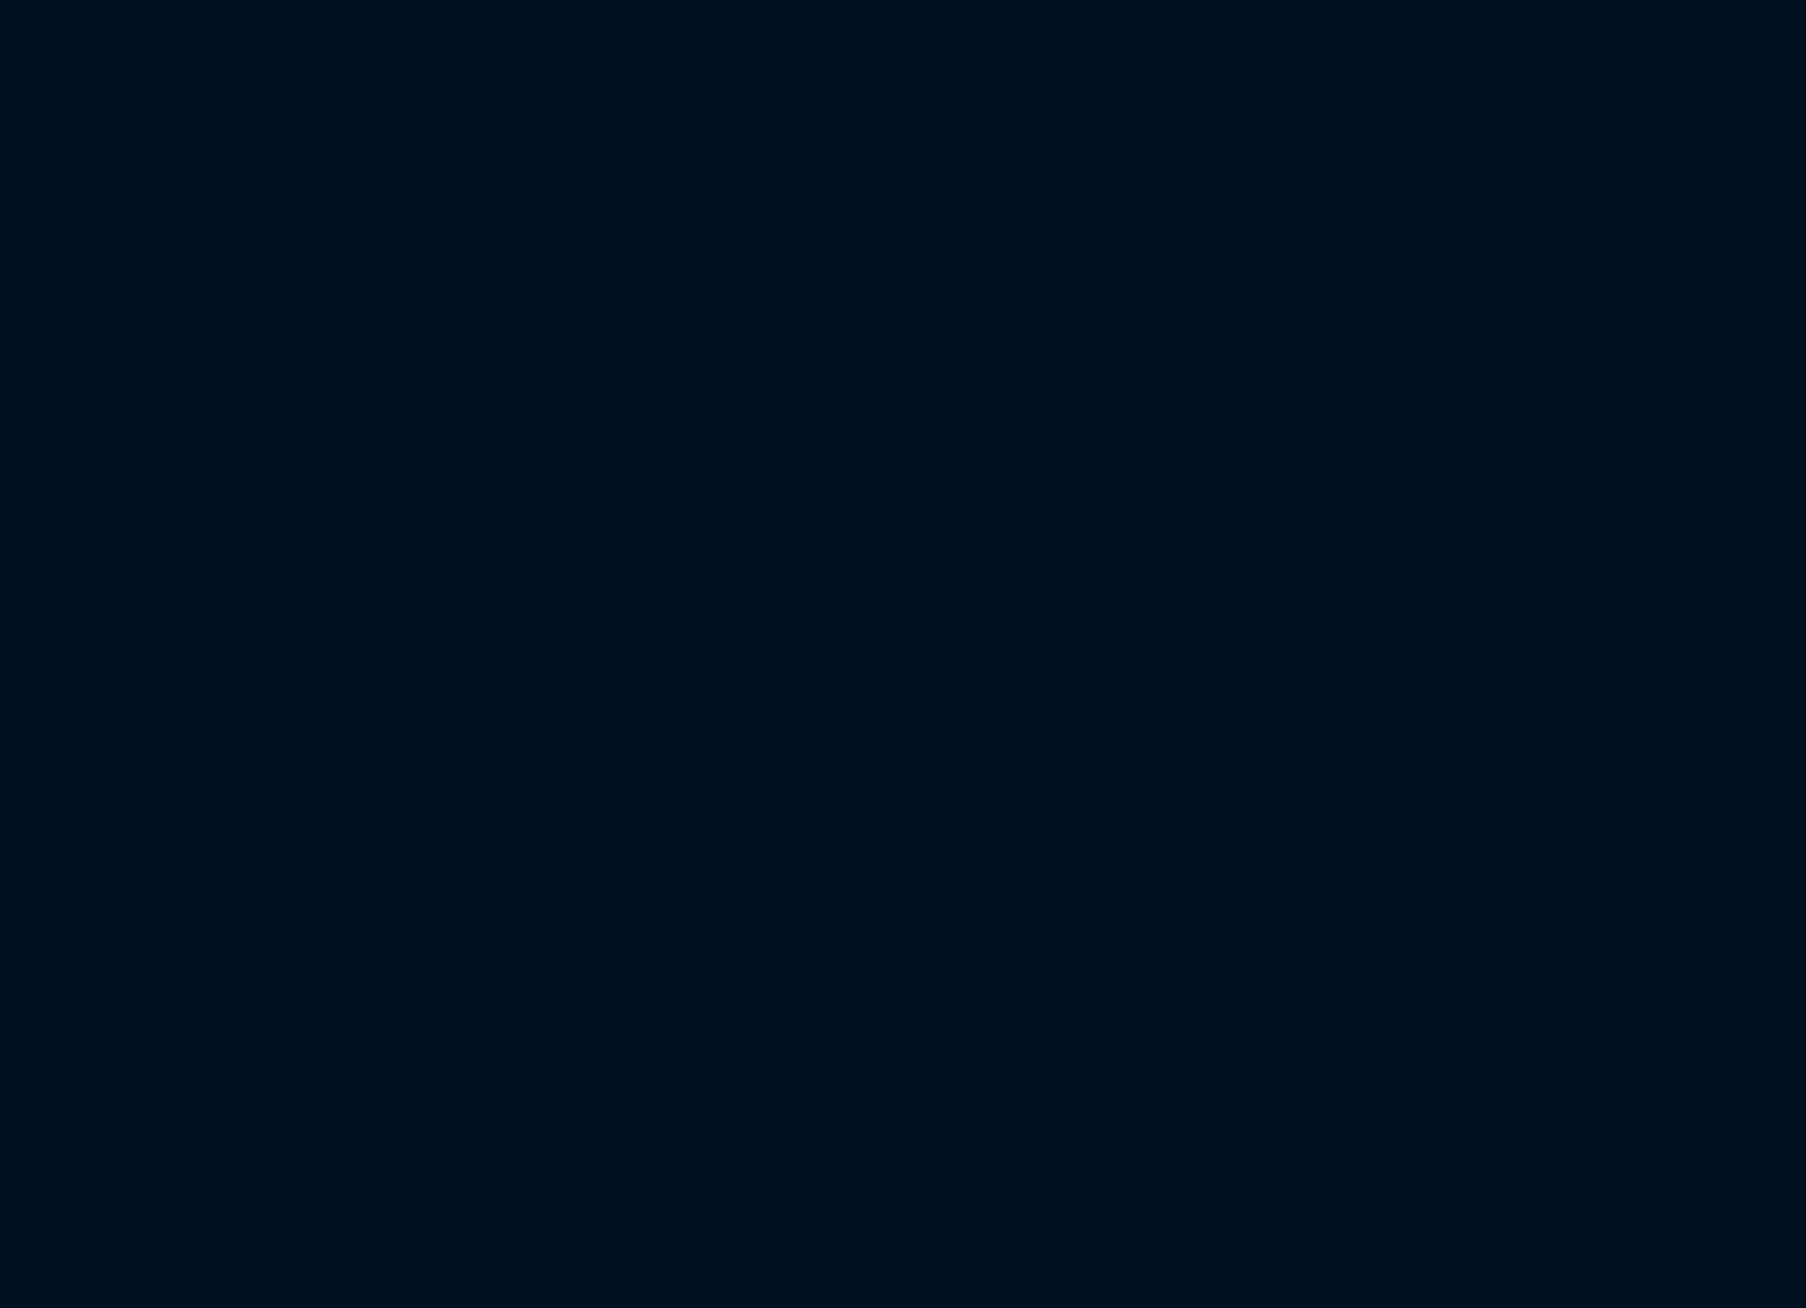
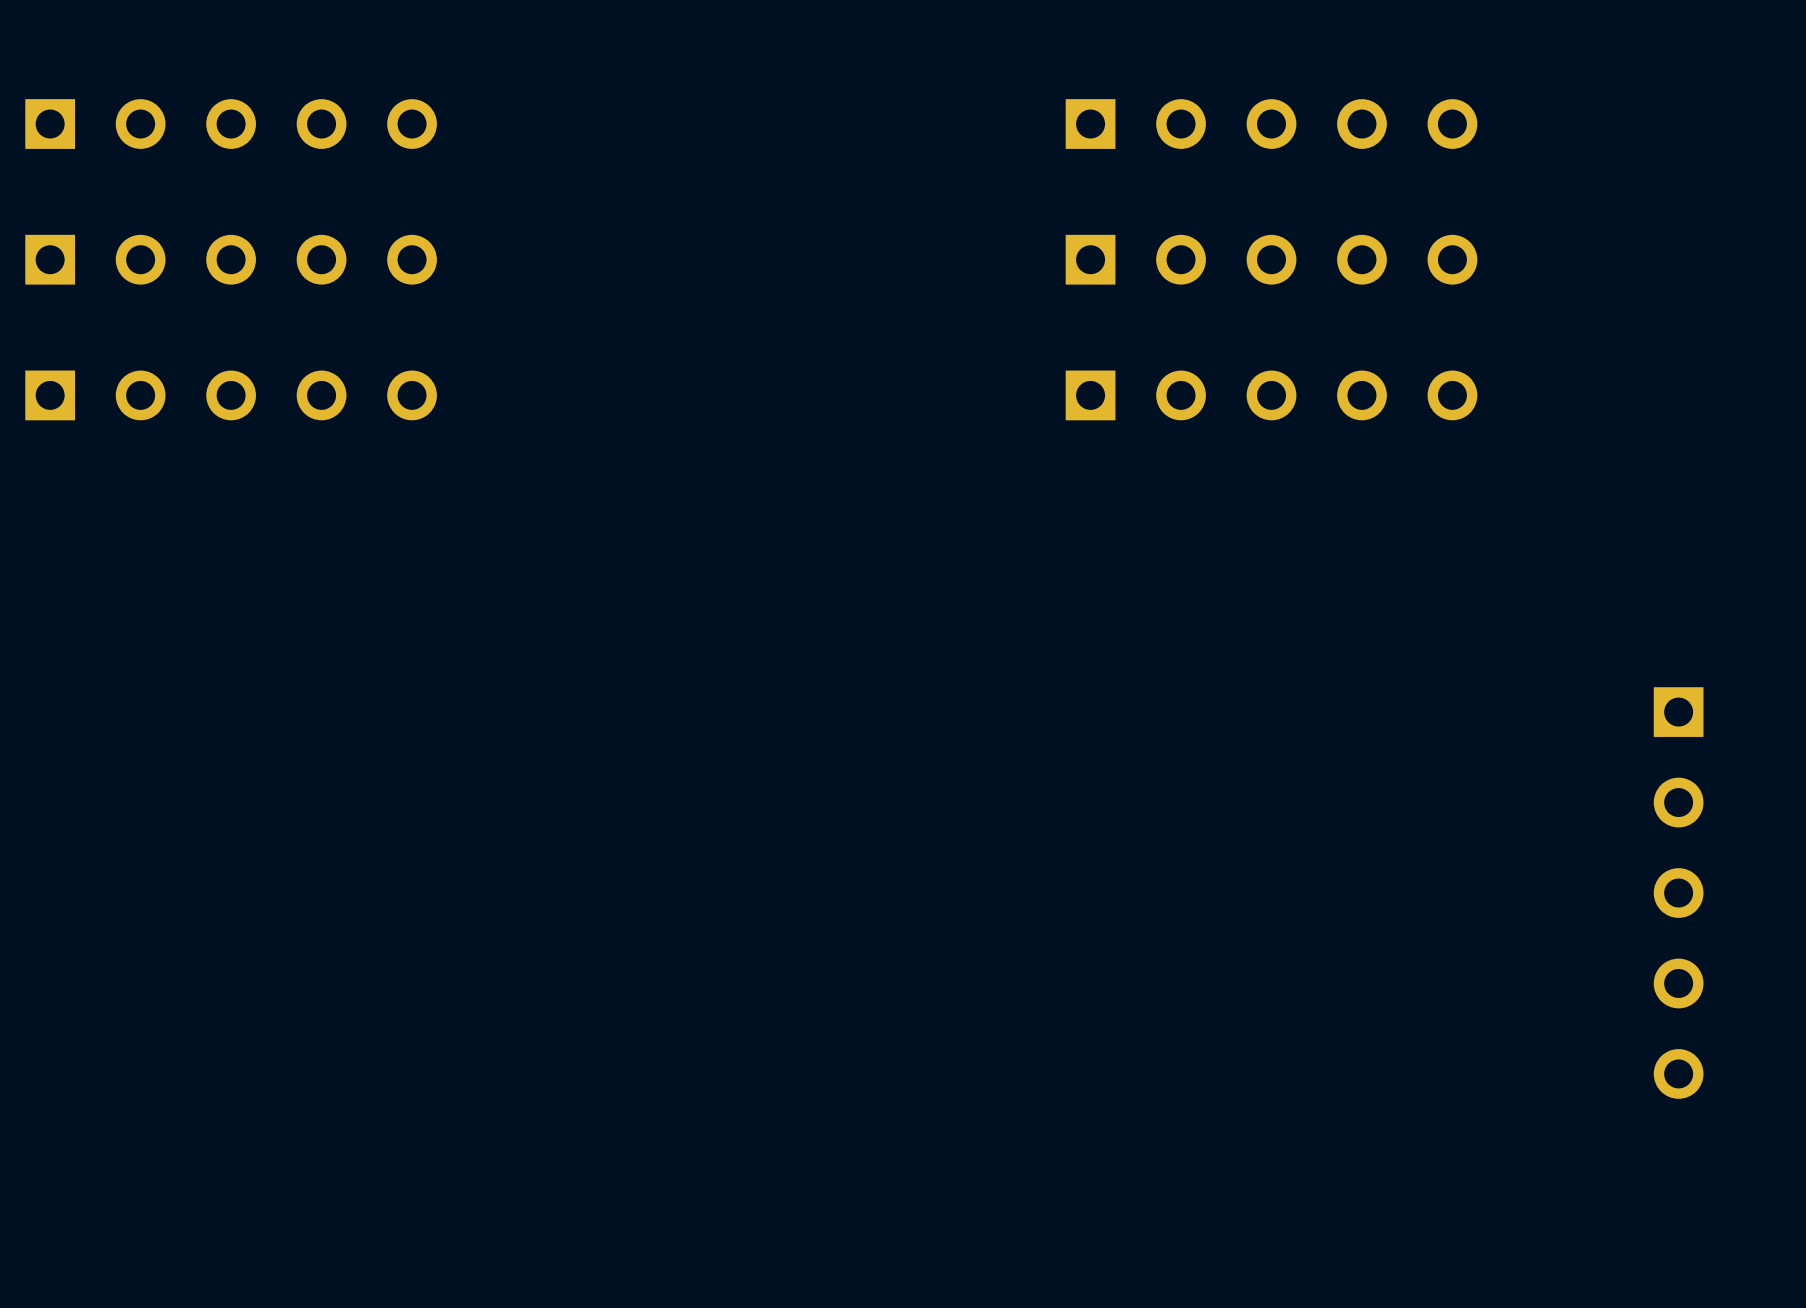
part: none -> (231, 124)
part: none -> (1271, 124)
part: none -> (231, 259)
part: none -> (1271, 259)
part: none -> (231, 395)
part: none -> (1271, 395)
part: none -> (1678, 893)

